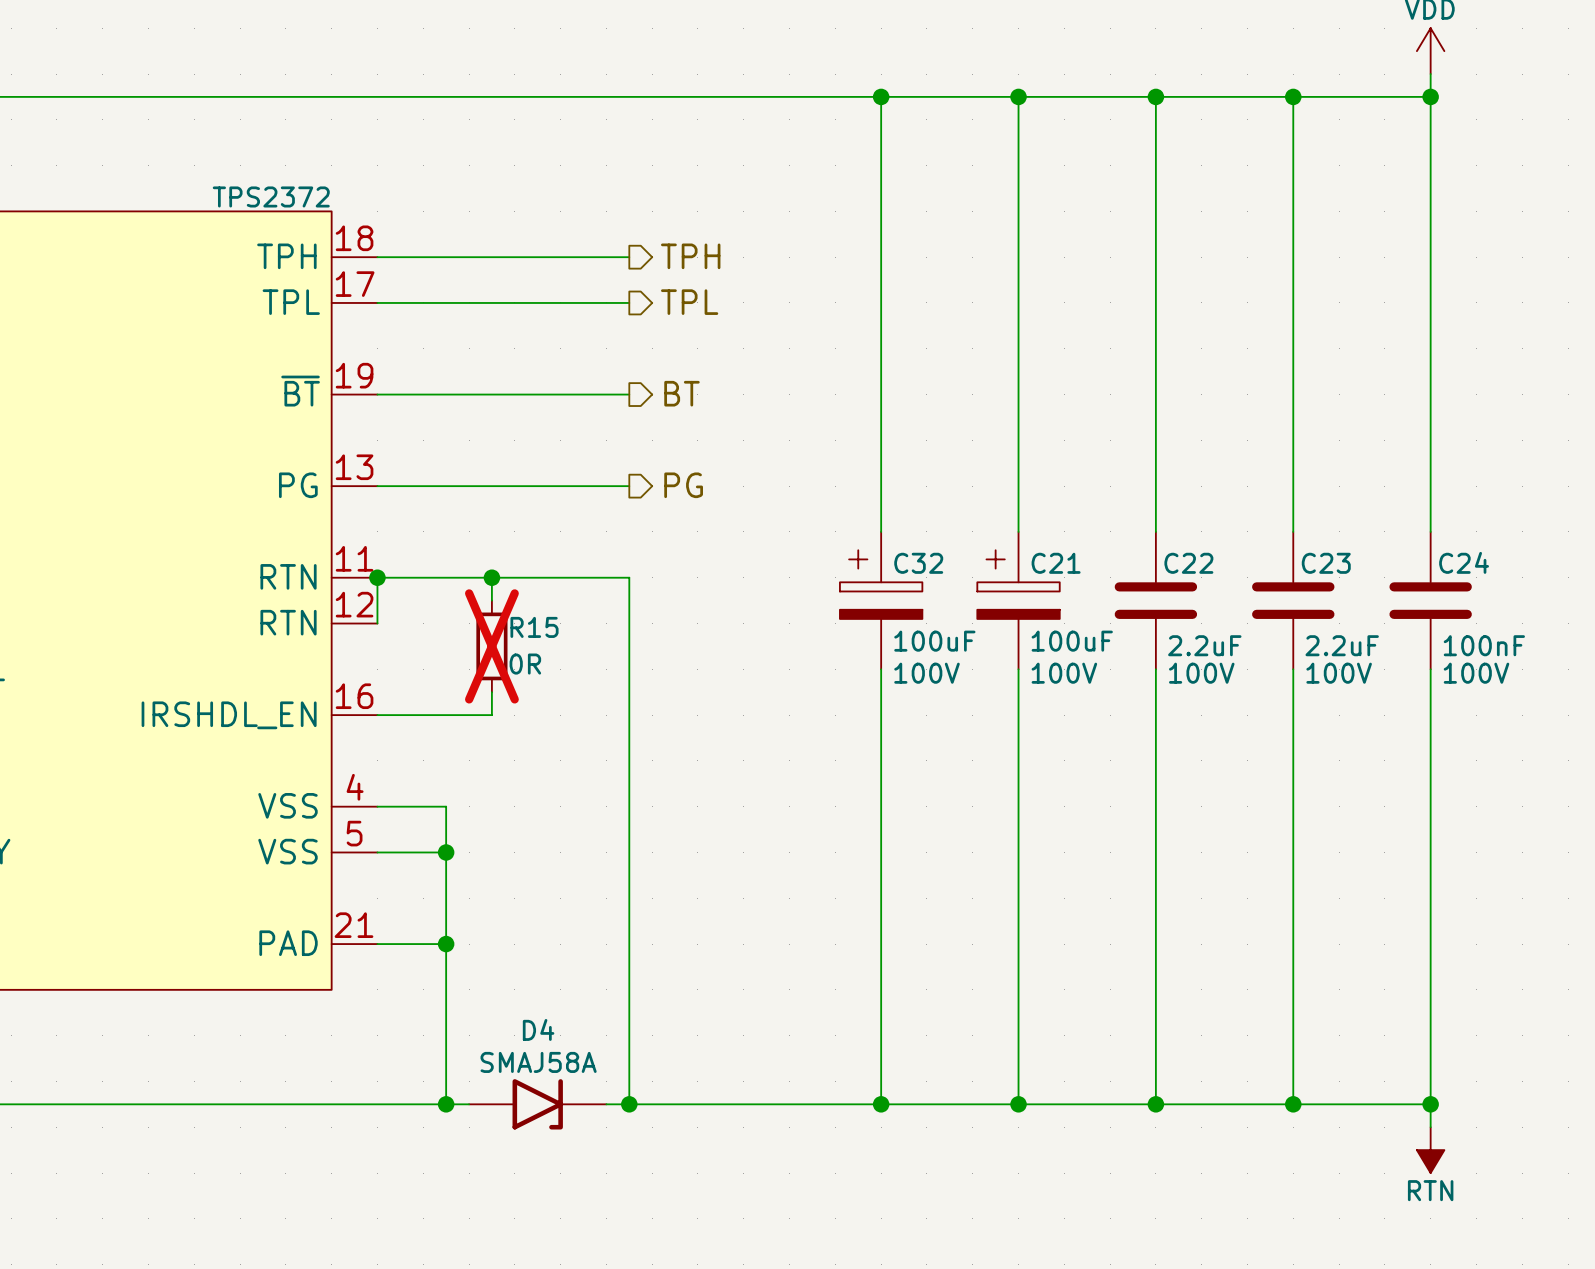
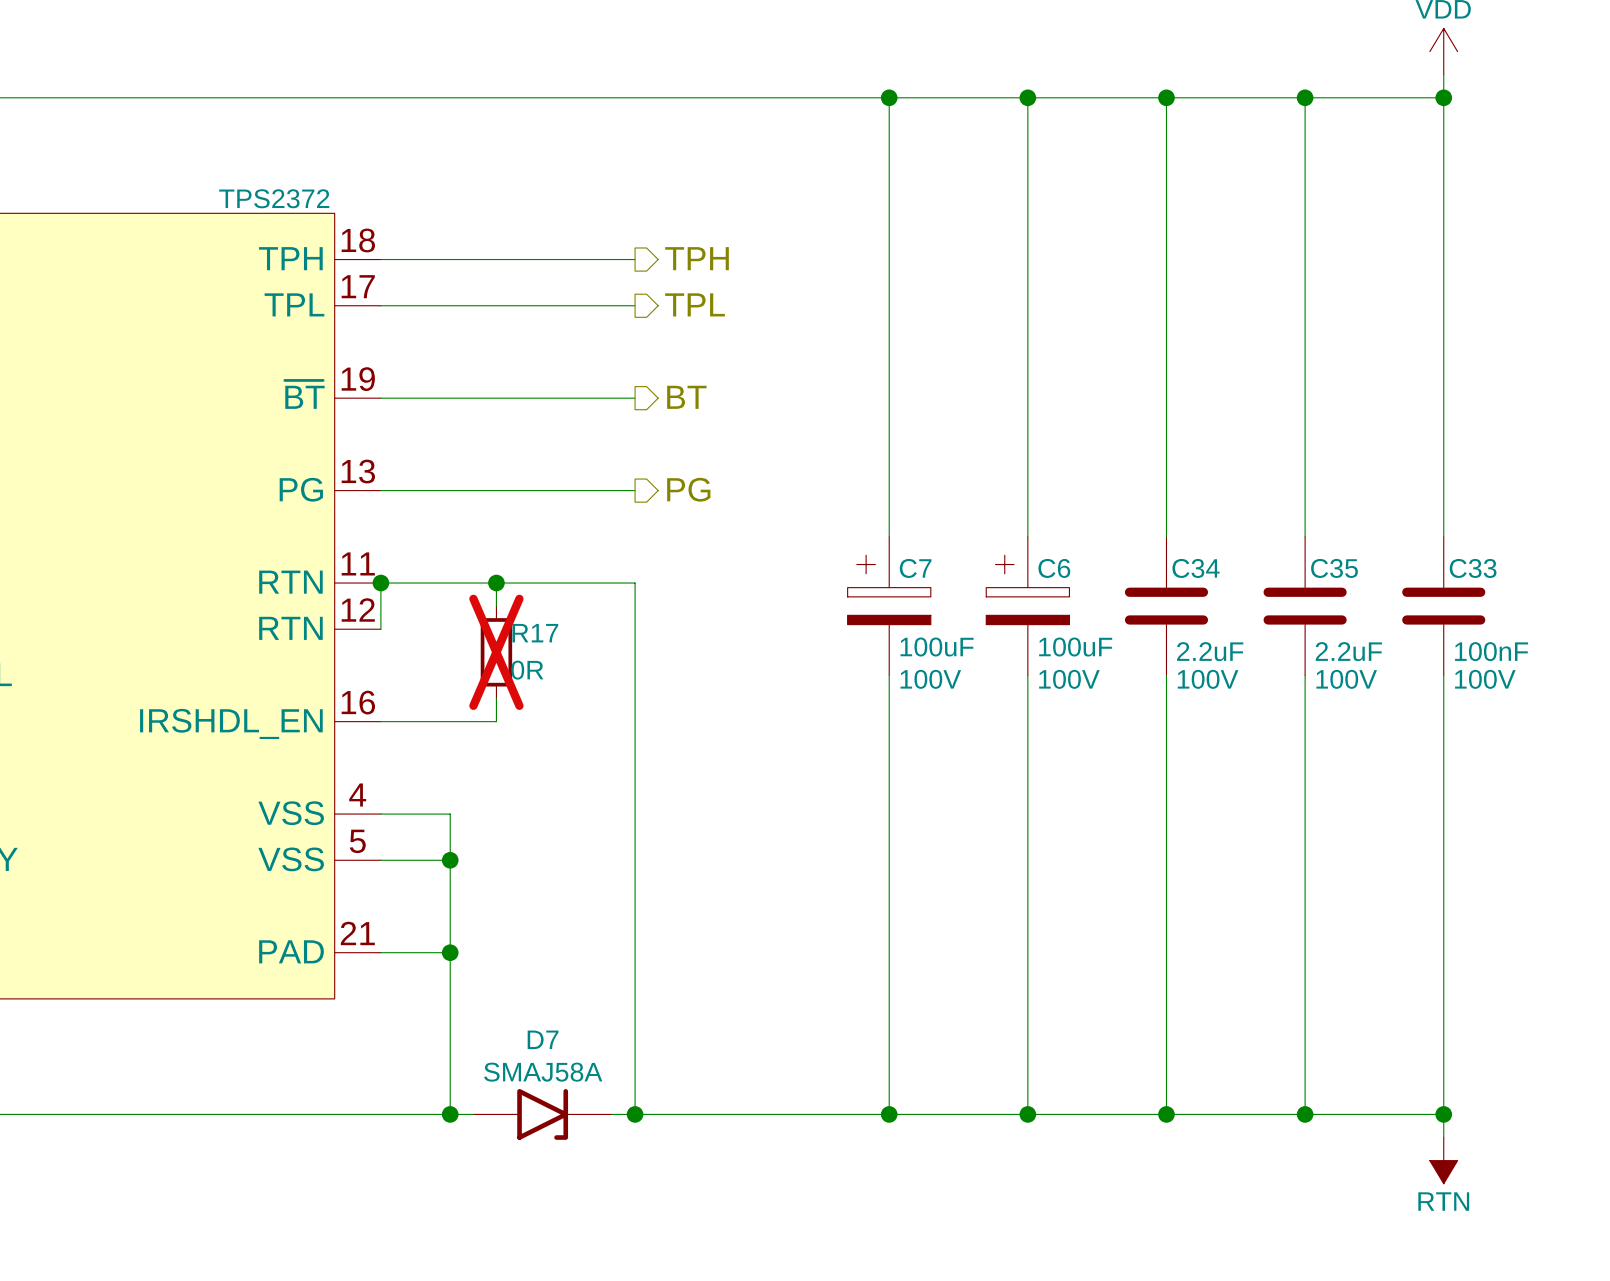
C24 name: C24 (1464, 562) -> C33 (1473, 568)
C32 name: C32 (918, 563) -> C7 (915, 568)
C21 name: C21 (1056, 563) -> C6 (1054, 568)
C22 name: C22 (1188, 563) -> C34 (1196, 568)
C23 name: C23 (1326, 563) -> C35 (1334, 568)
R15 name: R15 (534, 627) -> R17 (535, 633)
D4 name: D4 (538, 1029) -> D7 (543, 1039)

